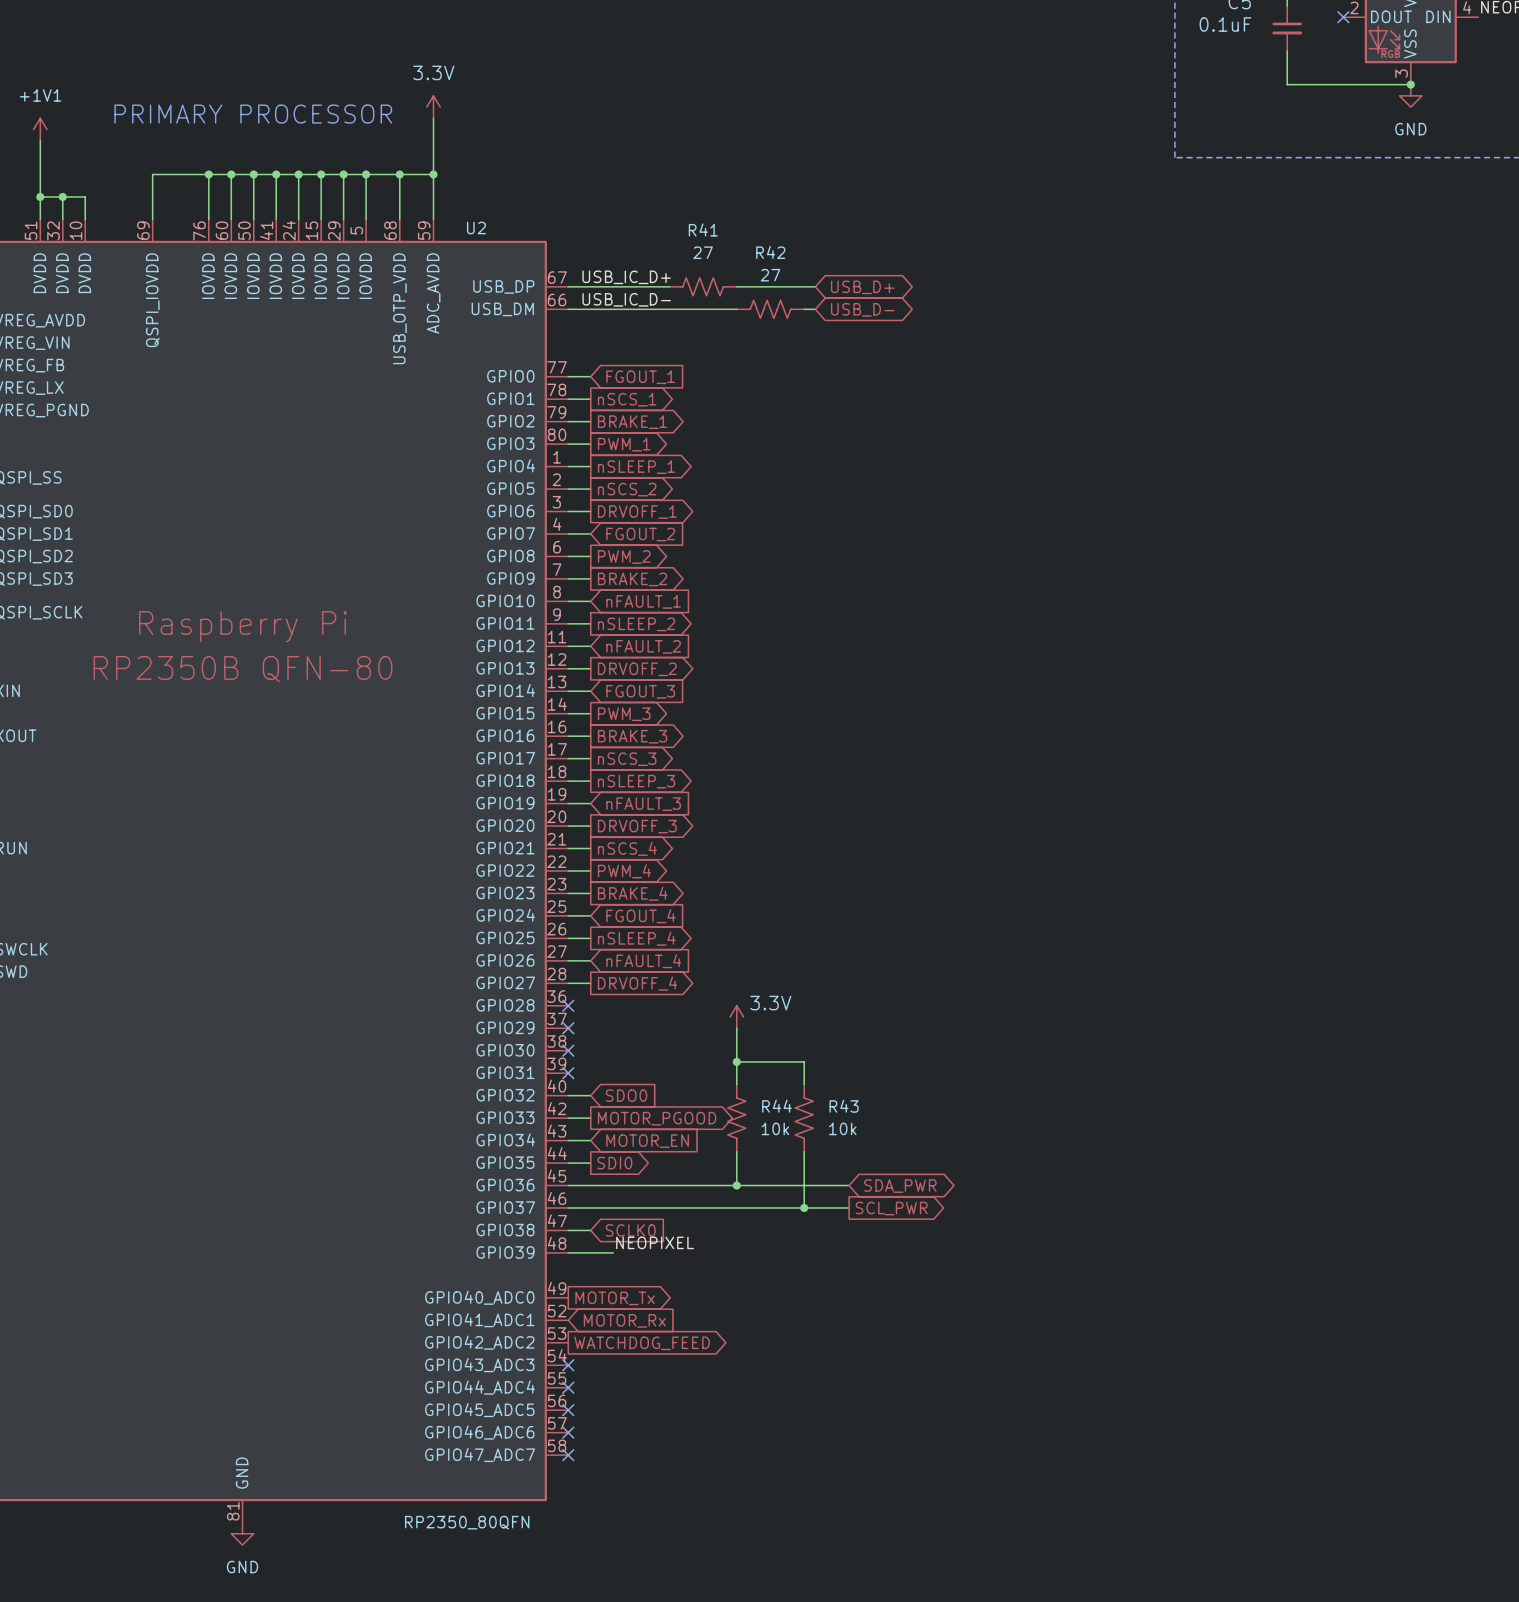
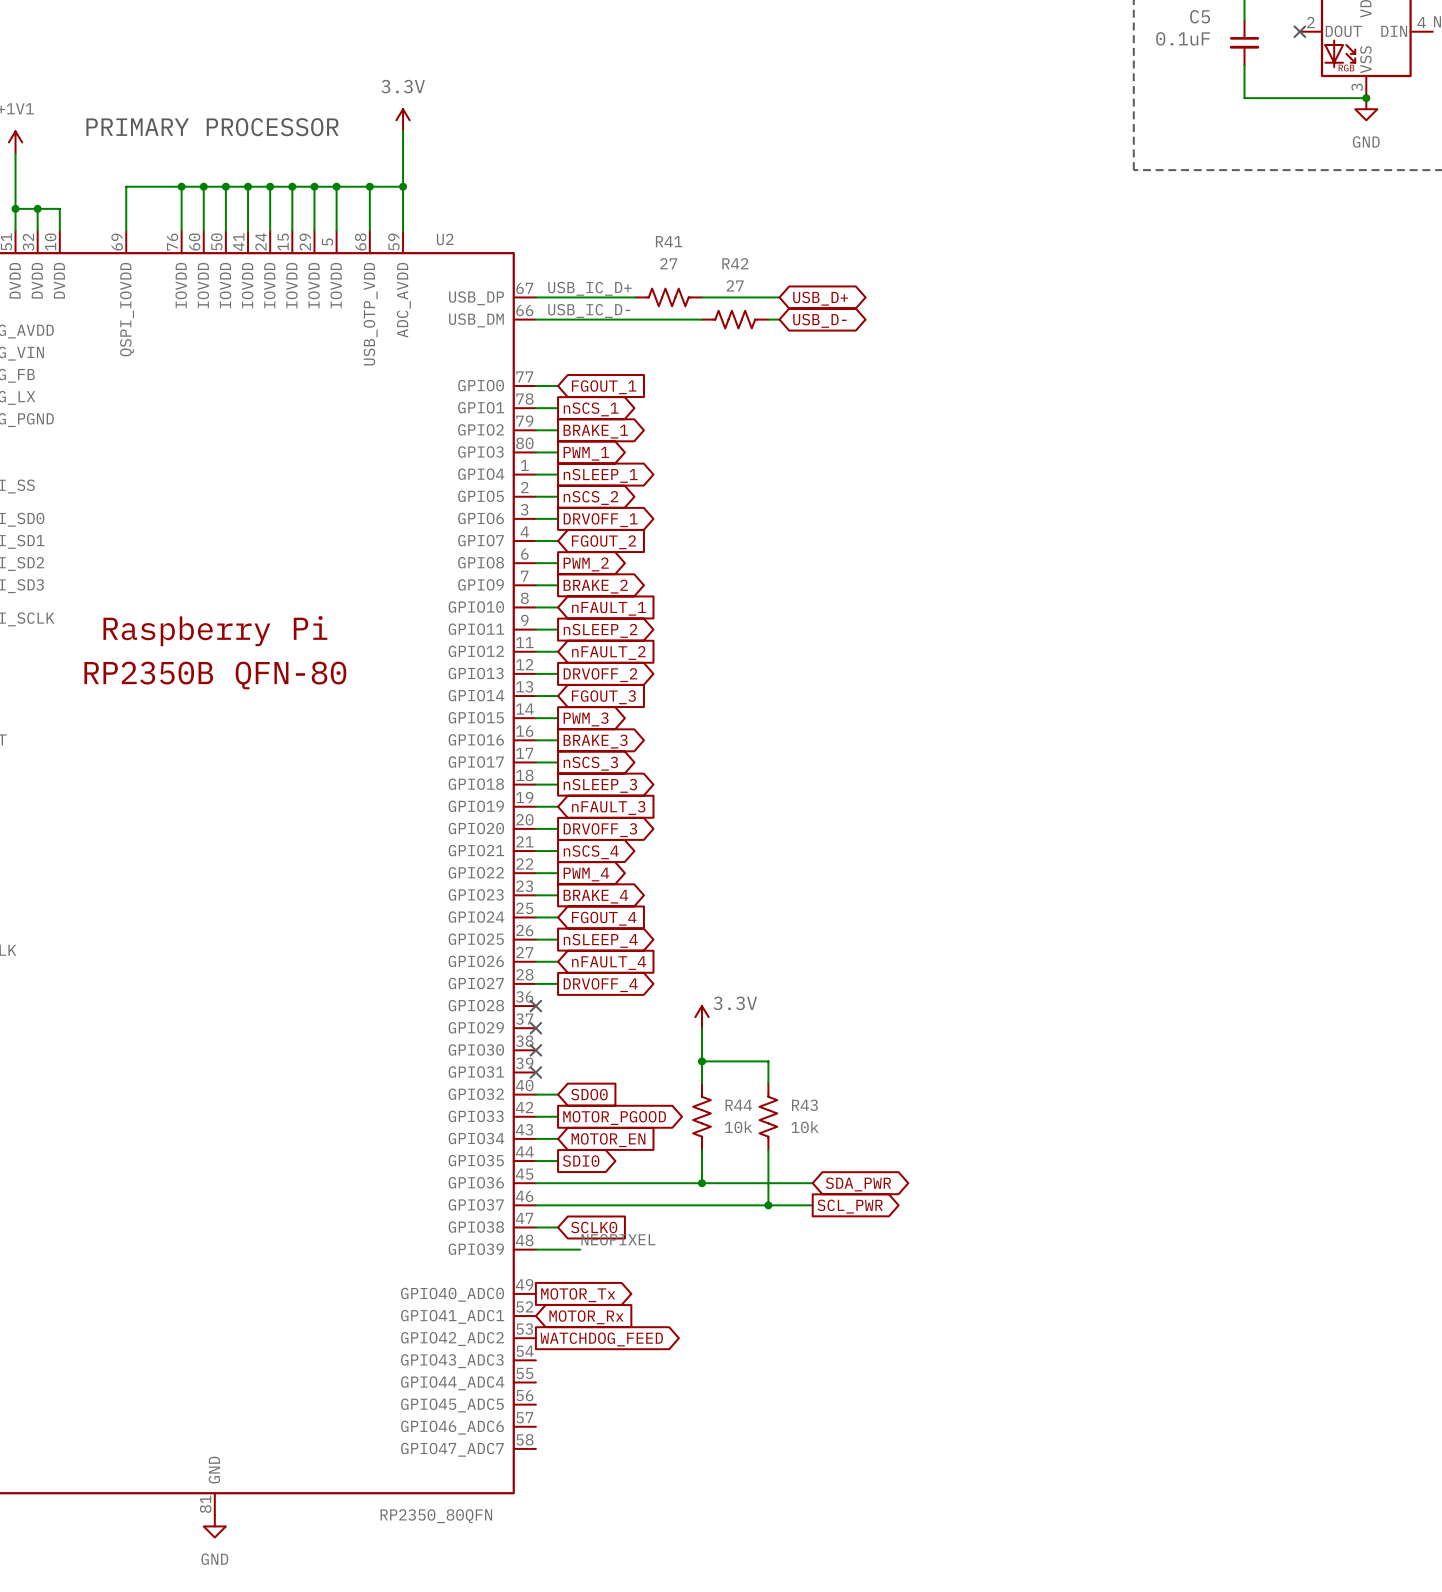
no-connect mark: (568, 1365) -> none
no-connect mark: (568, 1387) -> none
no-connect mark: (568, 1410) -> none
no-connect mark: (568, 1432) -> none
no-connect mark: (568, 1455) -> none

